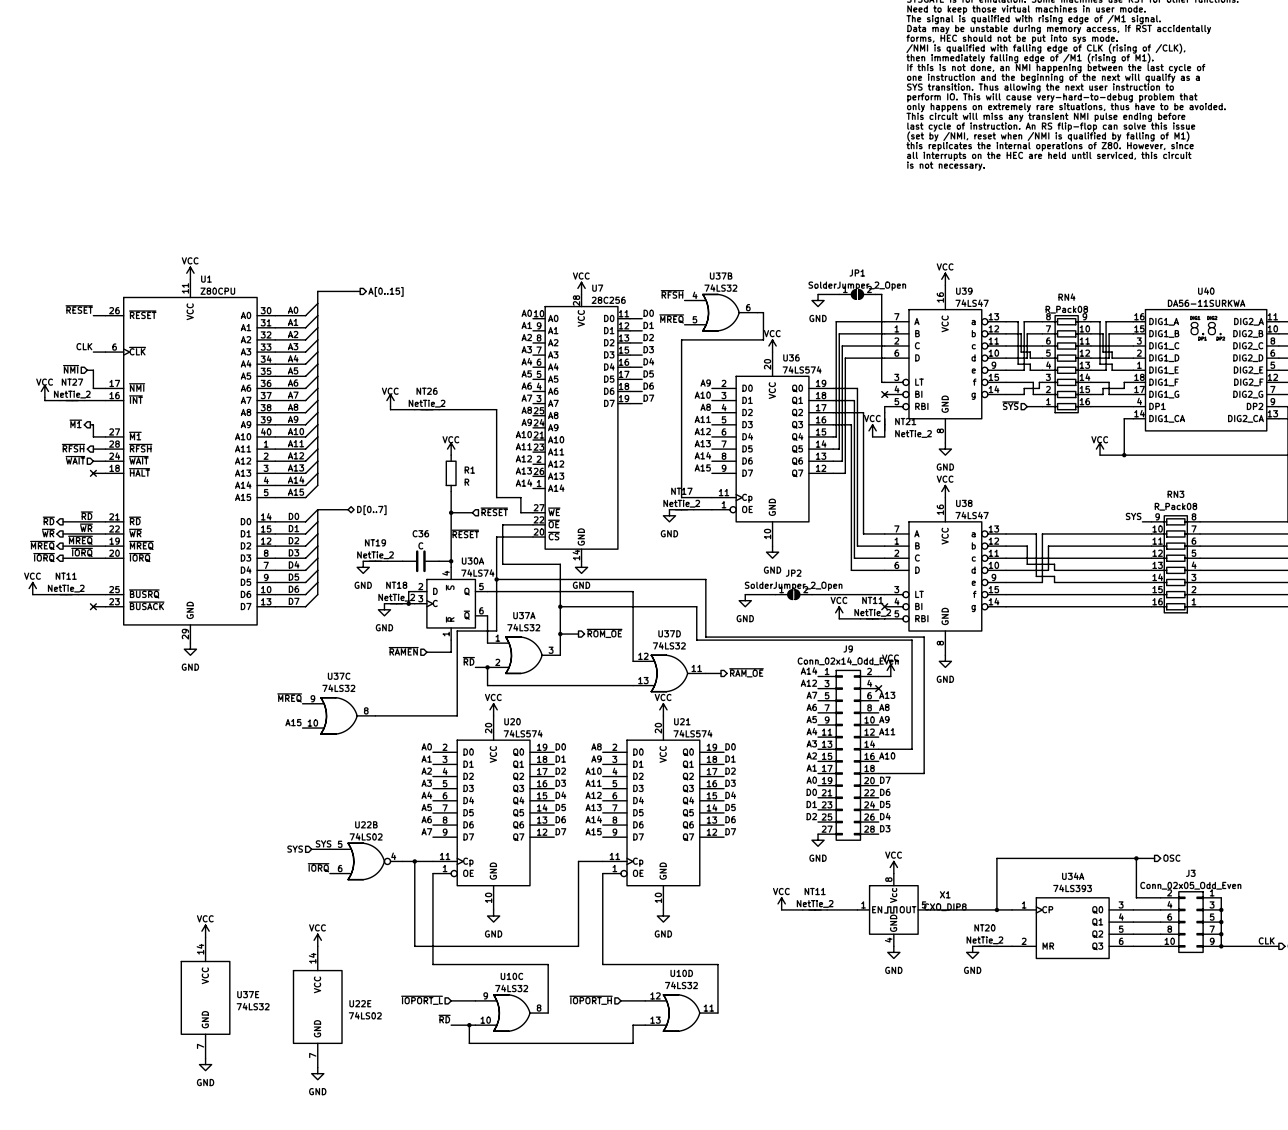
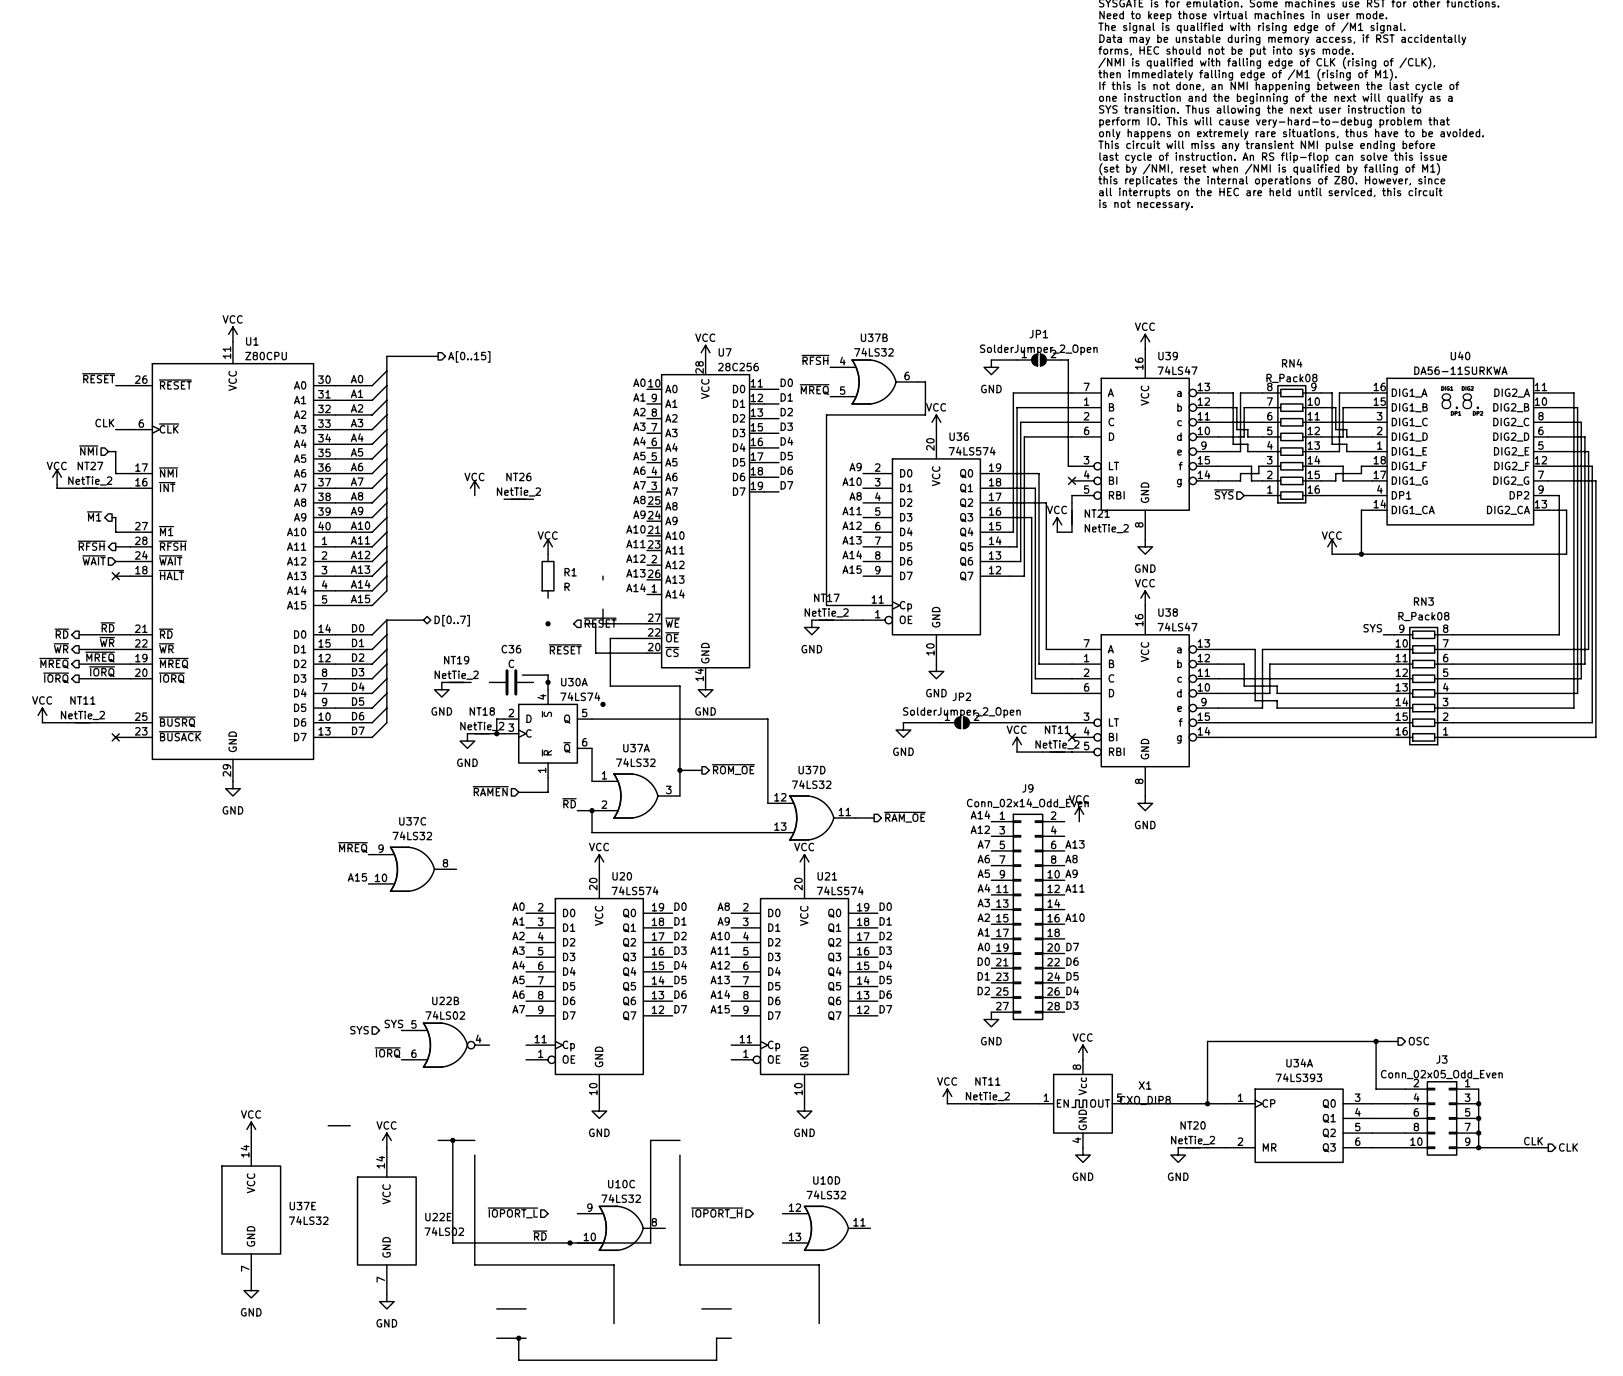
wire: (390, 406) (390, 409) (414, 409) -> none
wire: (439, 409) (496, 409) (496, 473) -> none
wire: (496, 476) (496, 497) (520, 497) (520, 512) -> (603, 609) (603, 623) (632, 623)
wire: (451, 491) (451, 555) -> (522, 675) (548, 675)
wire: (451, 512) (472, 512) -> none
wire: (496, 537) (496, 631) (457, 631) (457, 715) (375, 715) -> (603, 653) (595, 653) (595, 623) (584, 623)
wire: (387, 561) (402, 561) -> none
wire: (439, 561) (451, 561) -> none
wire: (496, 579) (705, 579) (705, 637) (924, 637) (924, 773) (878, 773) -> none
wire: (560, 606) (696, 606) (696, 640) (912, 640) (912, 749) (878, 749) -> none
junction: (560, 606) -> none
wire: (878, 676) (890, 676) -> none
no-connect mark: (878, 688) -> none
wire: (311, 849) (329, 849) -> (328, 1125) (350, 1125)
wire: (402, 861) (432, 861) -> (438, 1140) (474, 1140)
wire: (414, 861) (414, 946) (578, 946) (578, 861) (602, 861) -> none
junction: (414, 861) -> none
wire: (432, 873) (432, 964) (548, 964) (548, 1013) -> none
wire: (602, 873) (602, 964) (717, 964) (717, 1013) -> none
wire: none -> (452, 1140) (452, 1242) (548, 1242)
junction: none -> (452, 1140)
wire: none -> (679, 1140) (650, 1140) (650, 1242) (577, 1242)
wire: none -> (679, 1155) (679, 1264)
wire: (451, 1000) (475, 1000) -> (496, 1308) (526, 1308)
wire: (620, 1000) (645, 1000) -> (701, 1308) (731, 1308)
wire: (469, 1025) (469, 1043) -> (474, 1155) (474, 1264) (570, 1264)
wire: (645, 1025) (633, 1025) (633, 1043) -> (819, 1323) (819, 1264) (767, 1264)
wire: (505, 1043) (560, 1043) -> (614, 1264) (614, 1323)
wire: none -> (496, 1338) (526, 1338)
wire: none -> (518, 1338) (518, 1360) (716, 1360) (716, 1338) (731, 1338)
junction: none -> (518, 1338)

